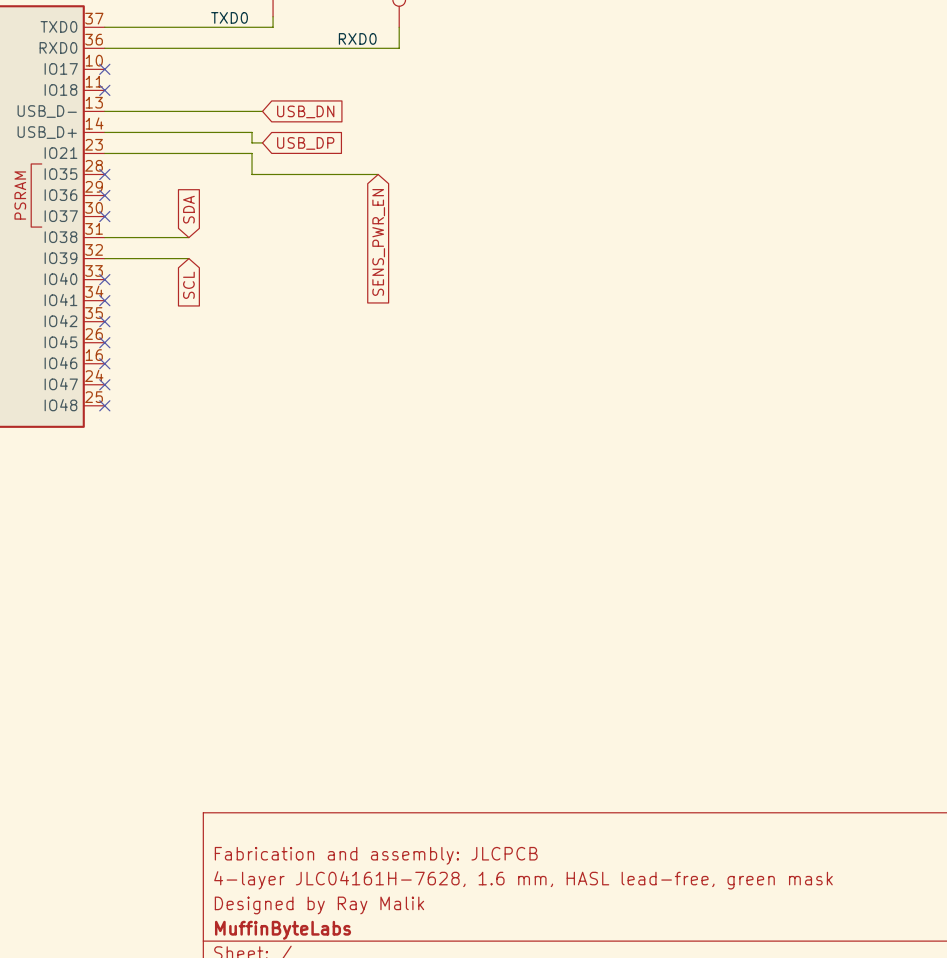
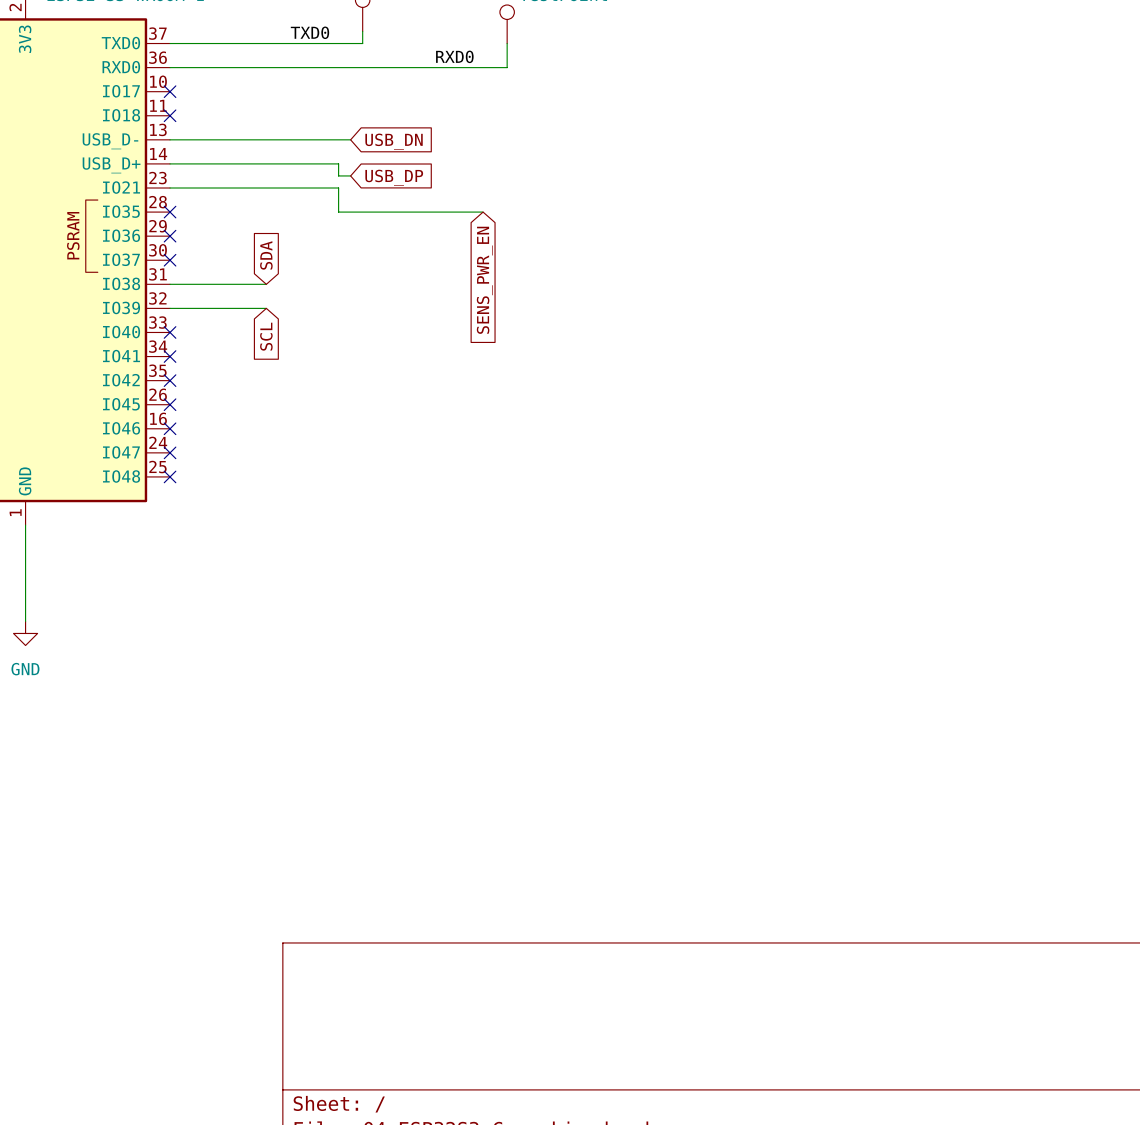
title block: Fabrication and assembly: JLCPCB (376, 855) -> none
title block: 4-layer JLC04161H-7628, 1.6 mm, HASL lead-free, green mask (523, 880) -> none
title block: Designed by Ray Malik (319, 905) -> none
title block: MuffinByteLabs (283, 930) -> none

